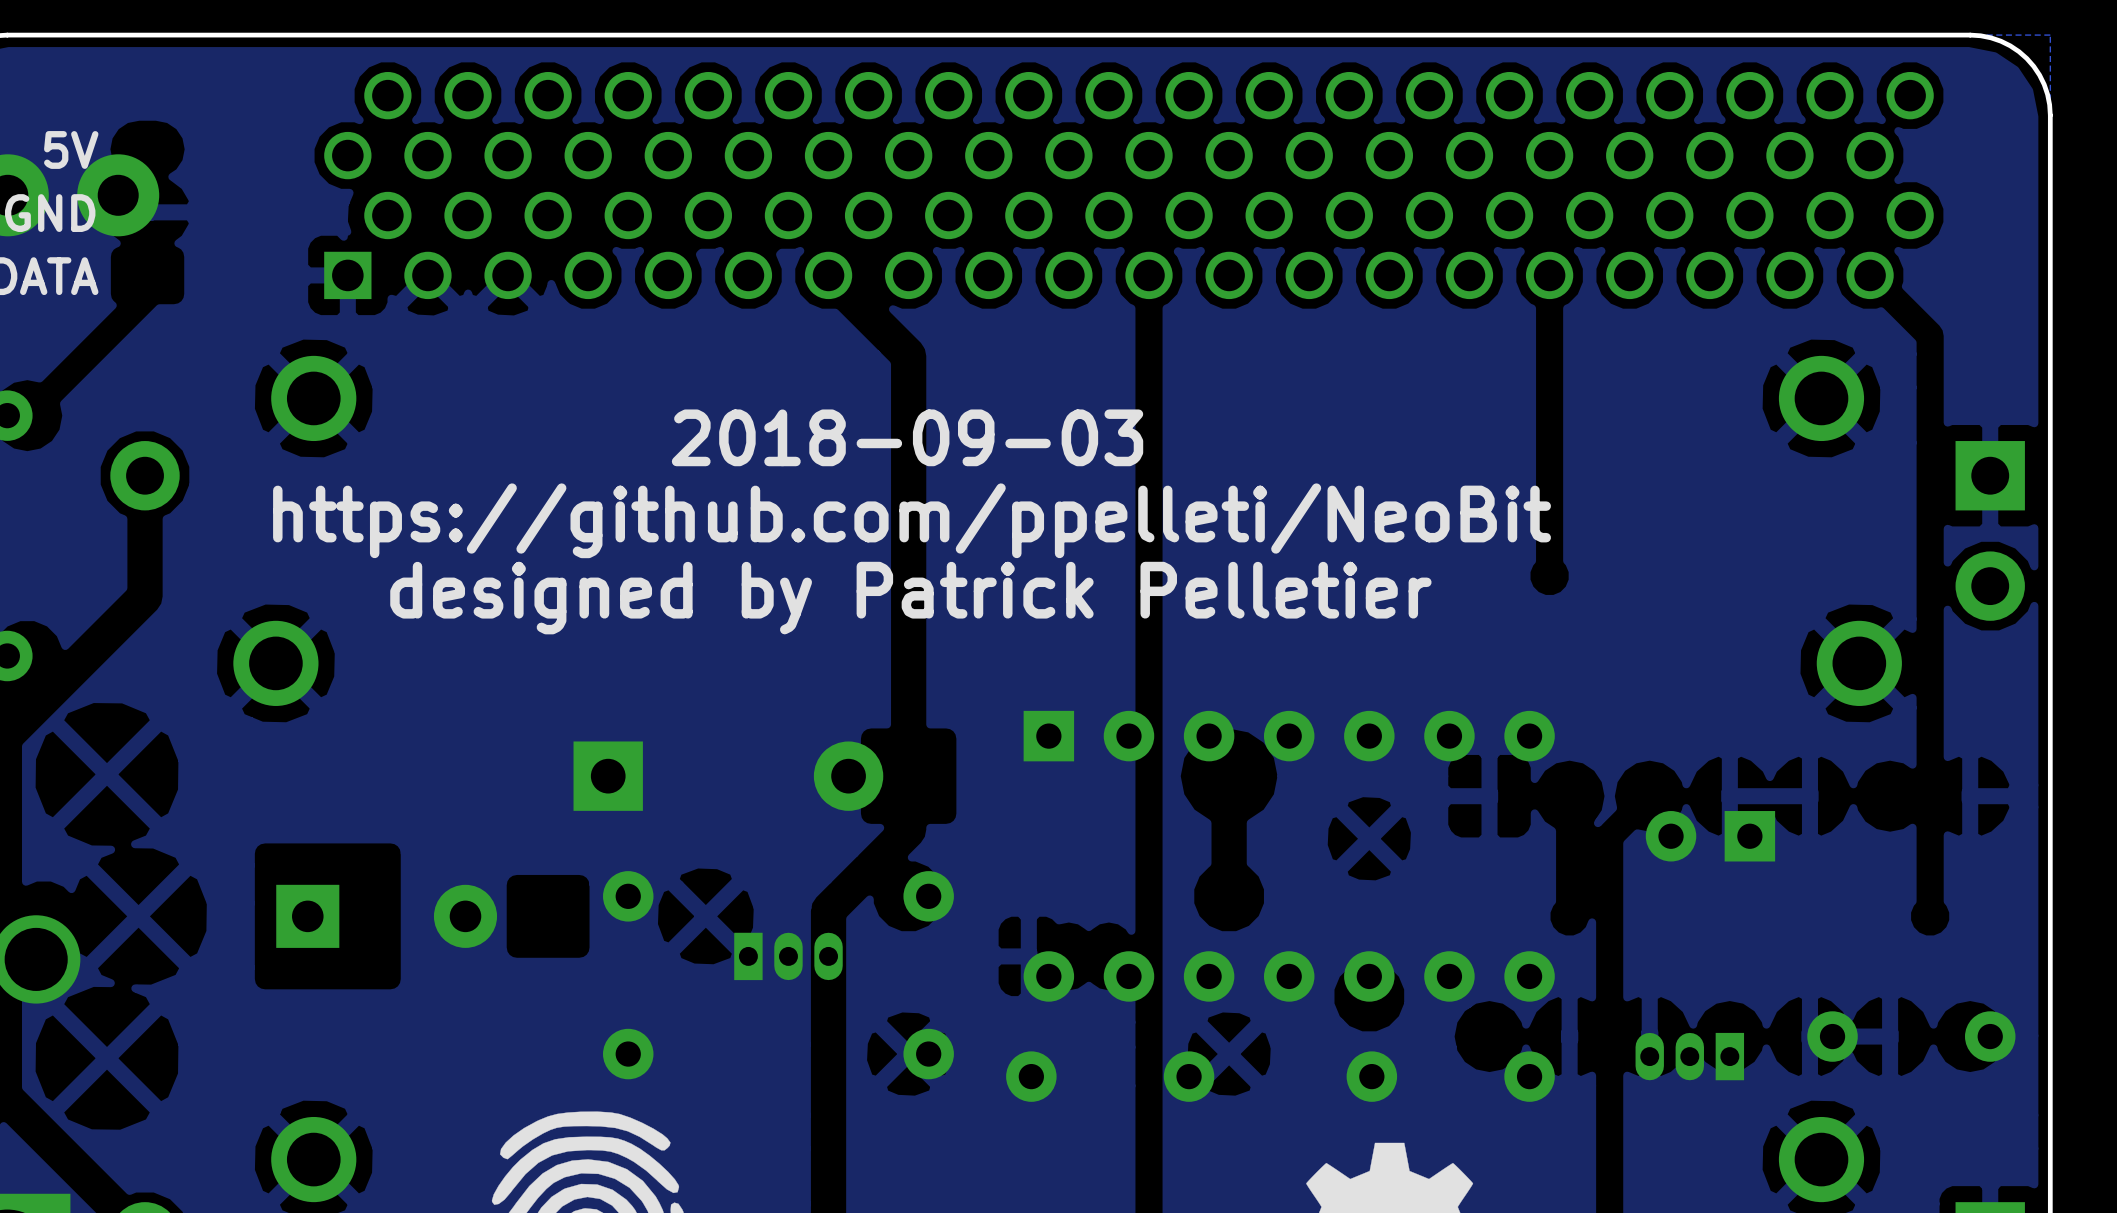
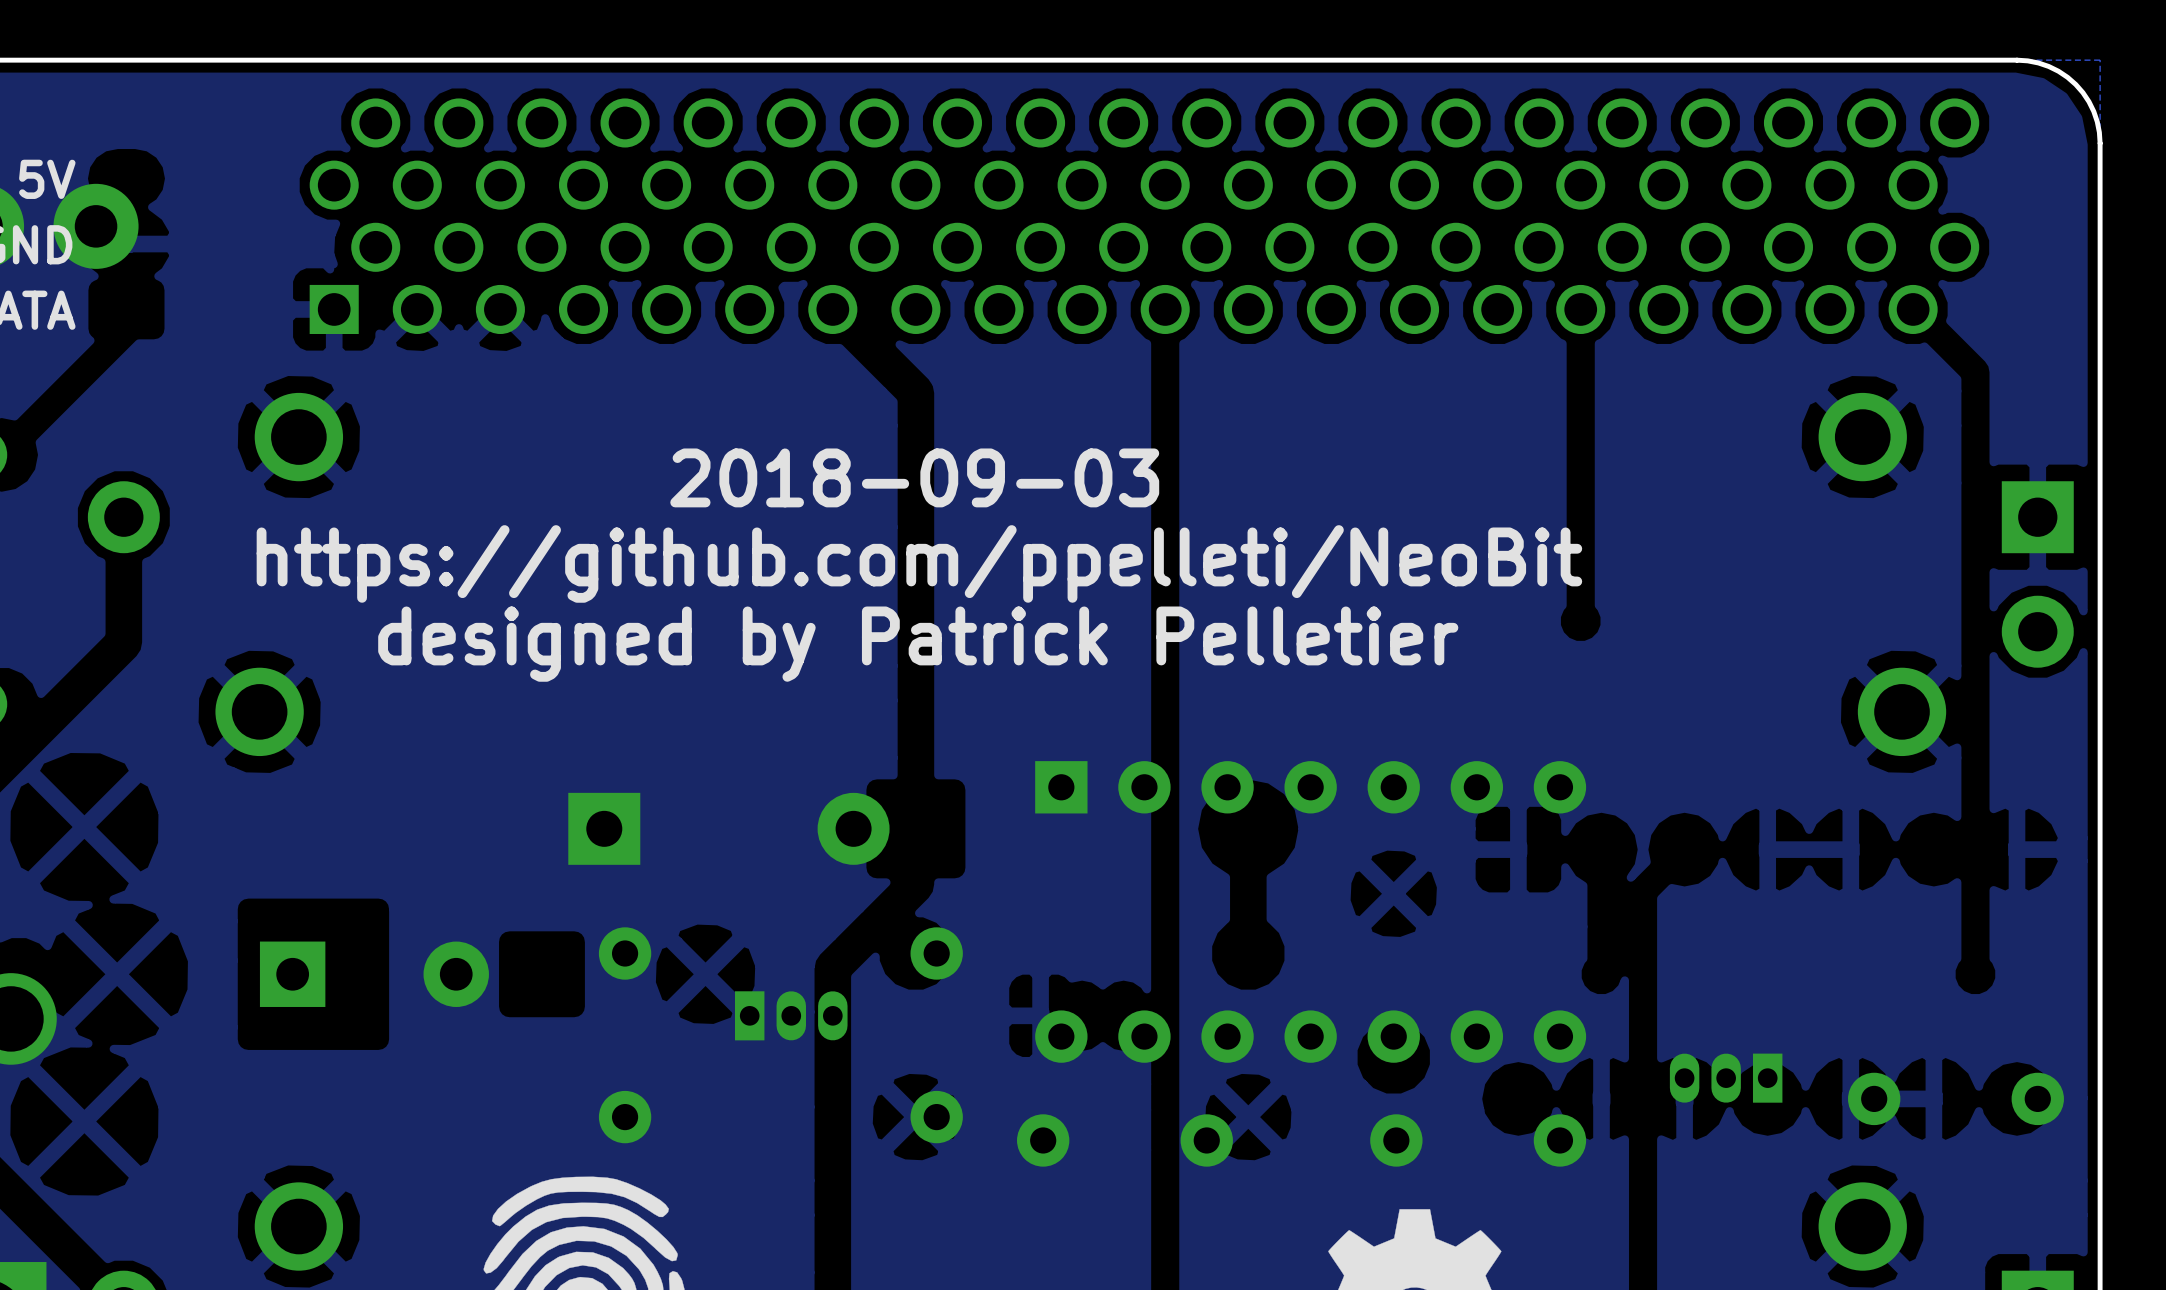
part: (1710, 836) -> none
part position: (1689, 1056) -> (1726, 1078)

